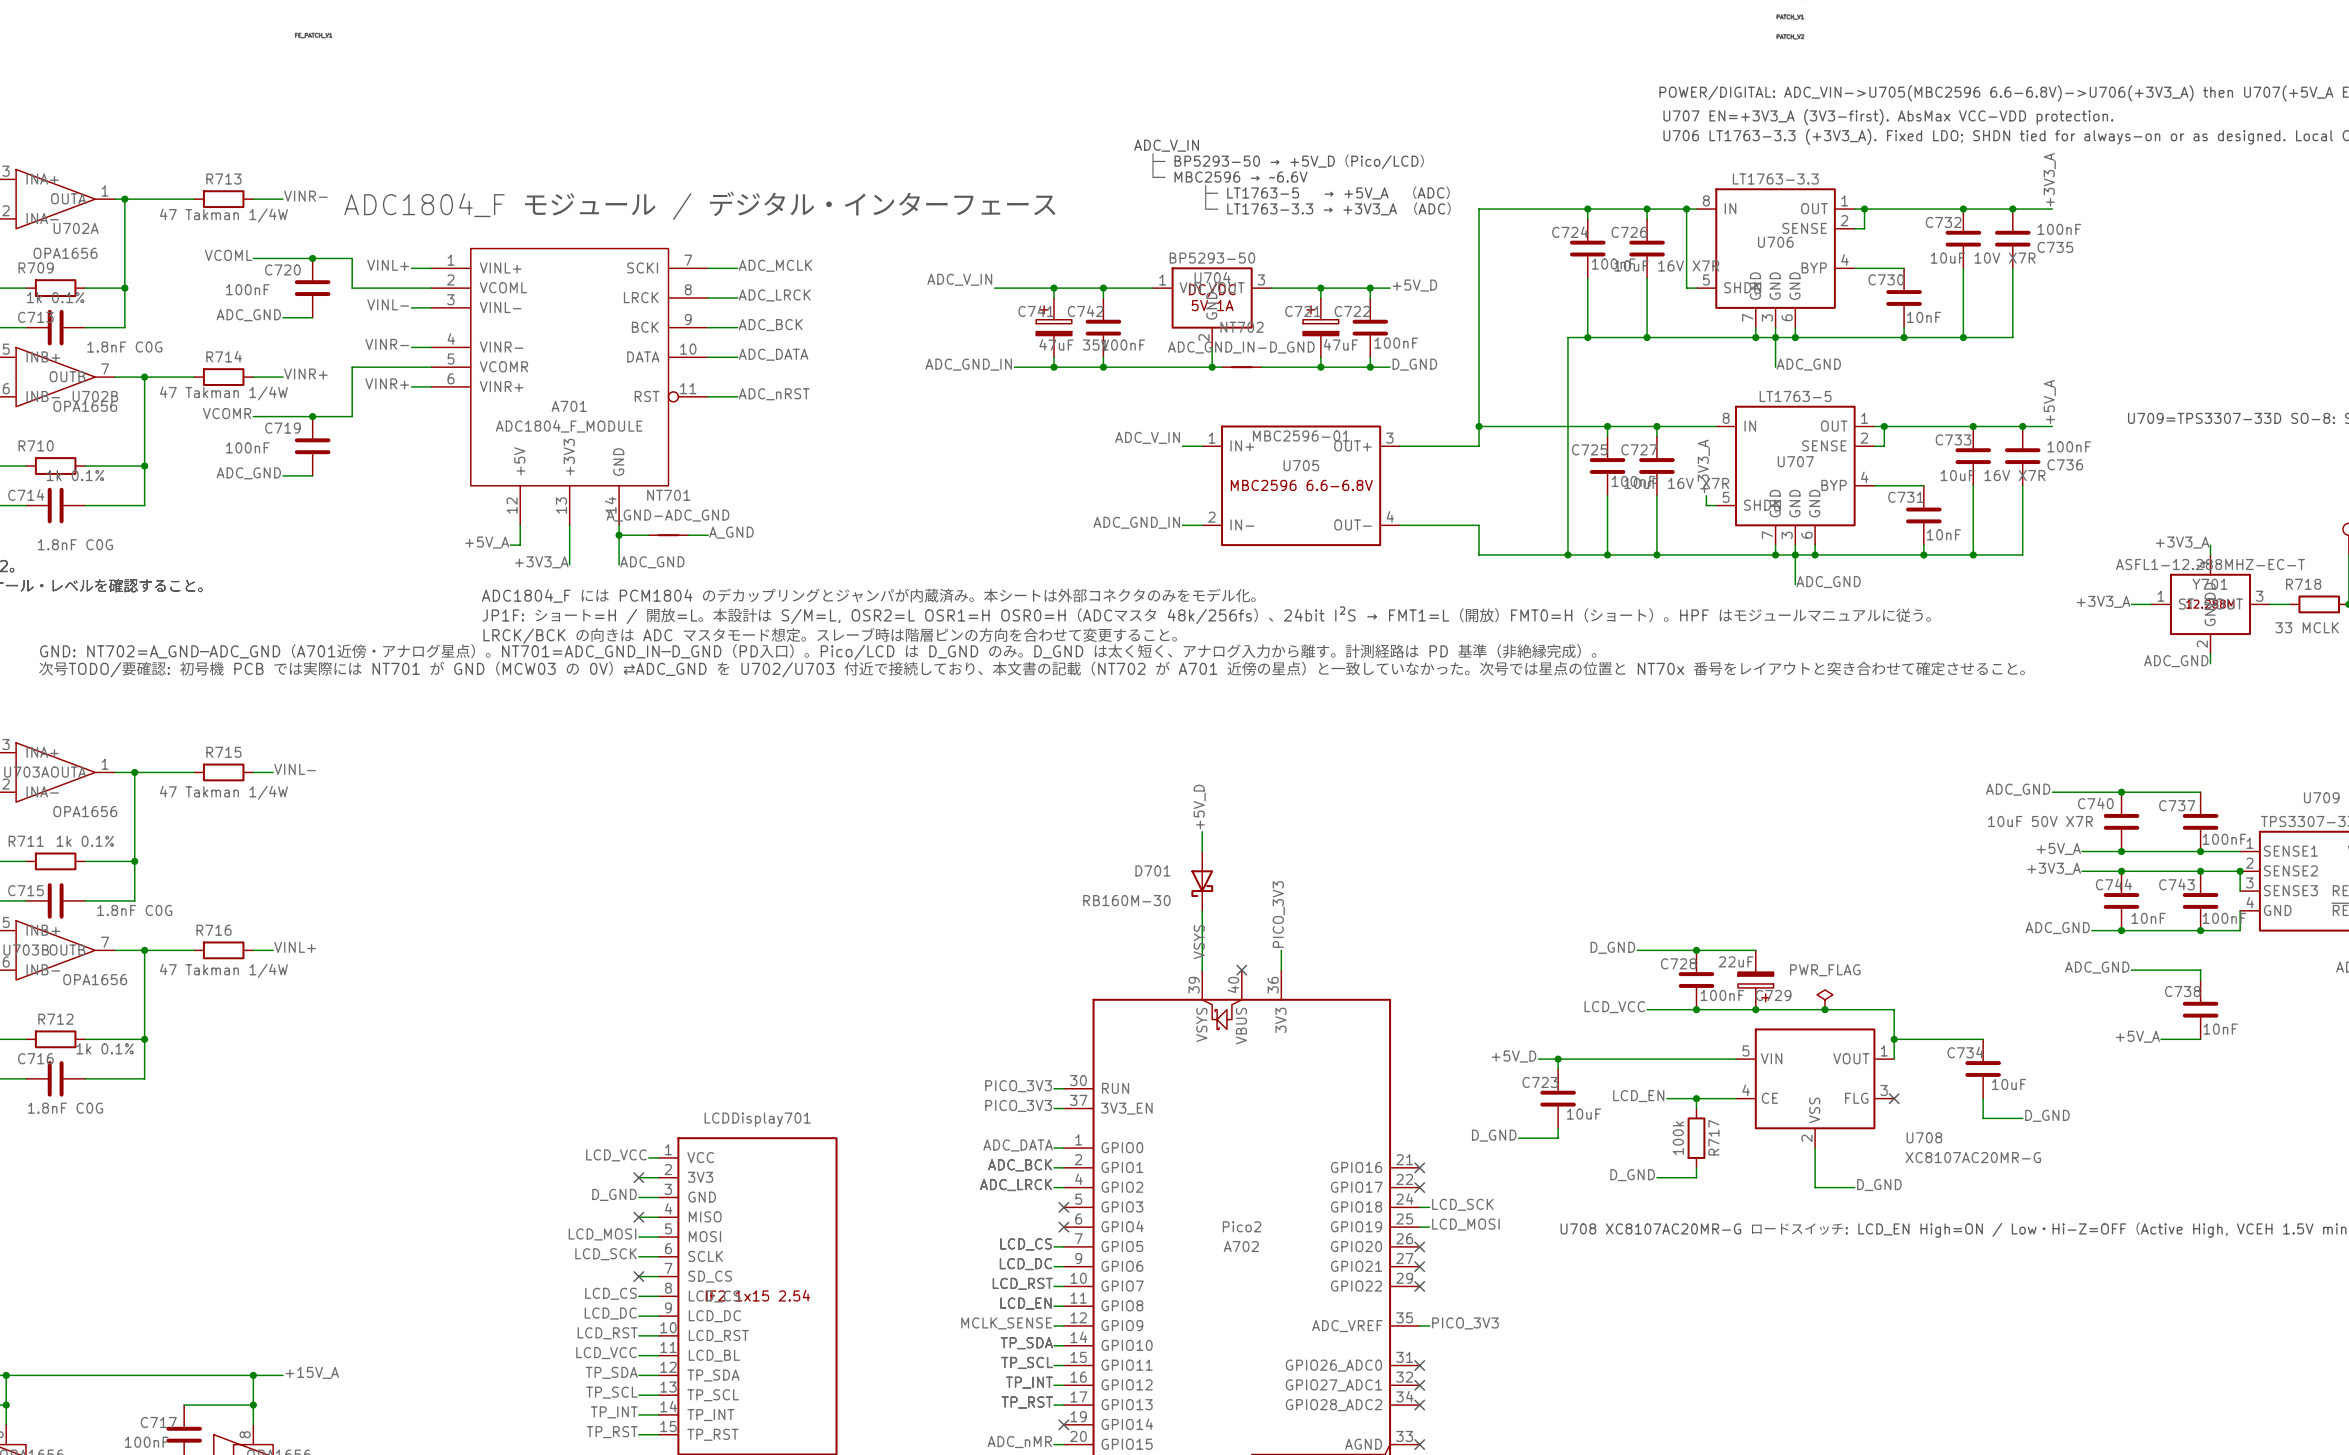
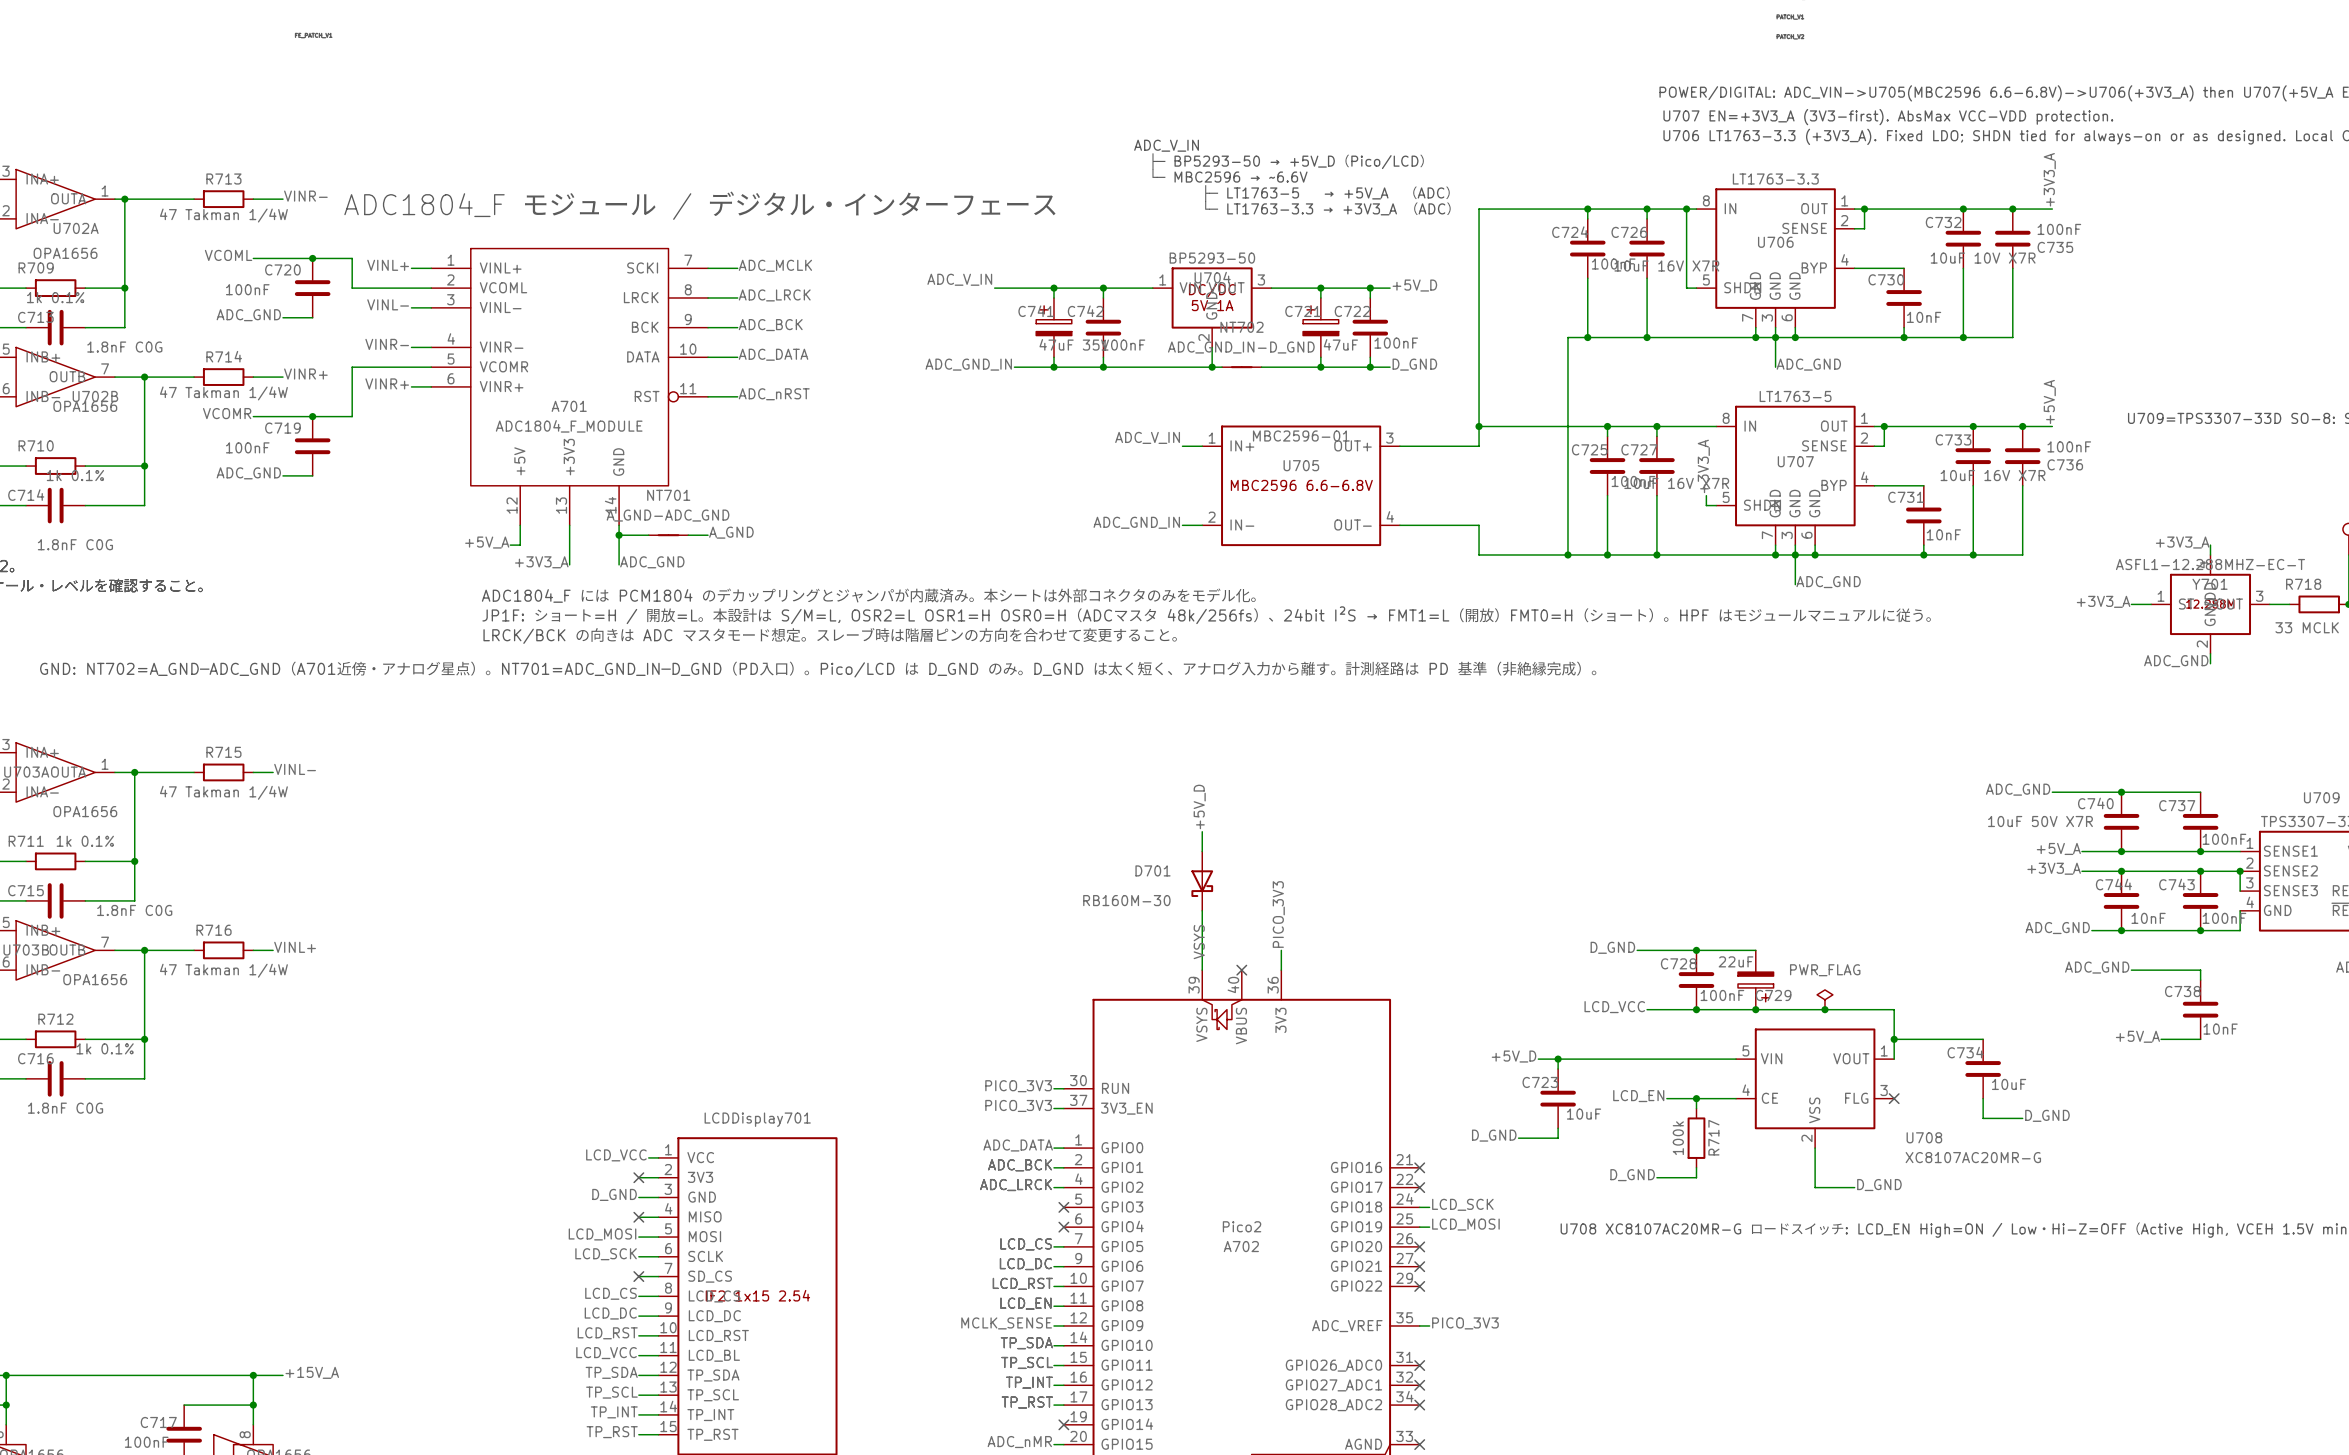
text: GND: NT702=A_GND─ADC_GND（A701近傍・アナログ星点）。NT701=ADC_GND_IN─D_GND（PD入口）。Pico/LCD は D_GND のみ。D_GND は太く短く、アナログ入力から離す。計測経路は PD 基準（非絶縁完成）。 (818, 651) -> none
text: 次号TODO/要確認: 初号機 PCB では実際には NT701 が GND（MCW03 の 0V）⇄ADC_GND を U702/U703 付近で接続しており、本文書の記載（NT702 が A701 近傍の星点）と一致していなかった。次号では星点の位置と NT70x 番号をレイアウトと突き合わせて確定させること。 (1032, 669) -> GND: NT702=A_GND─ADC_GND（A701近傍・アナログ星点）。NT701=ADC_GND_IN─D_GND（PD入口）。Pico/LCD は D_GND のみ。D_GND は太く短く、アナログ入力から離す。計測経路は PD 基準（非絶縁完成）。 (818, 669)

